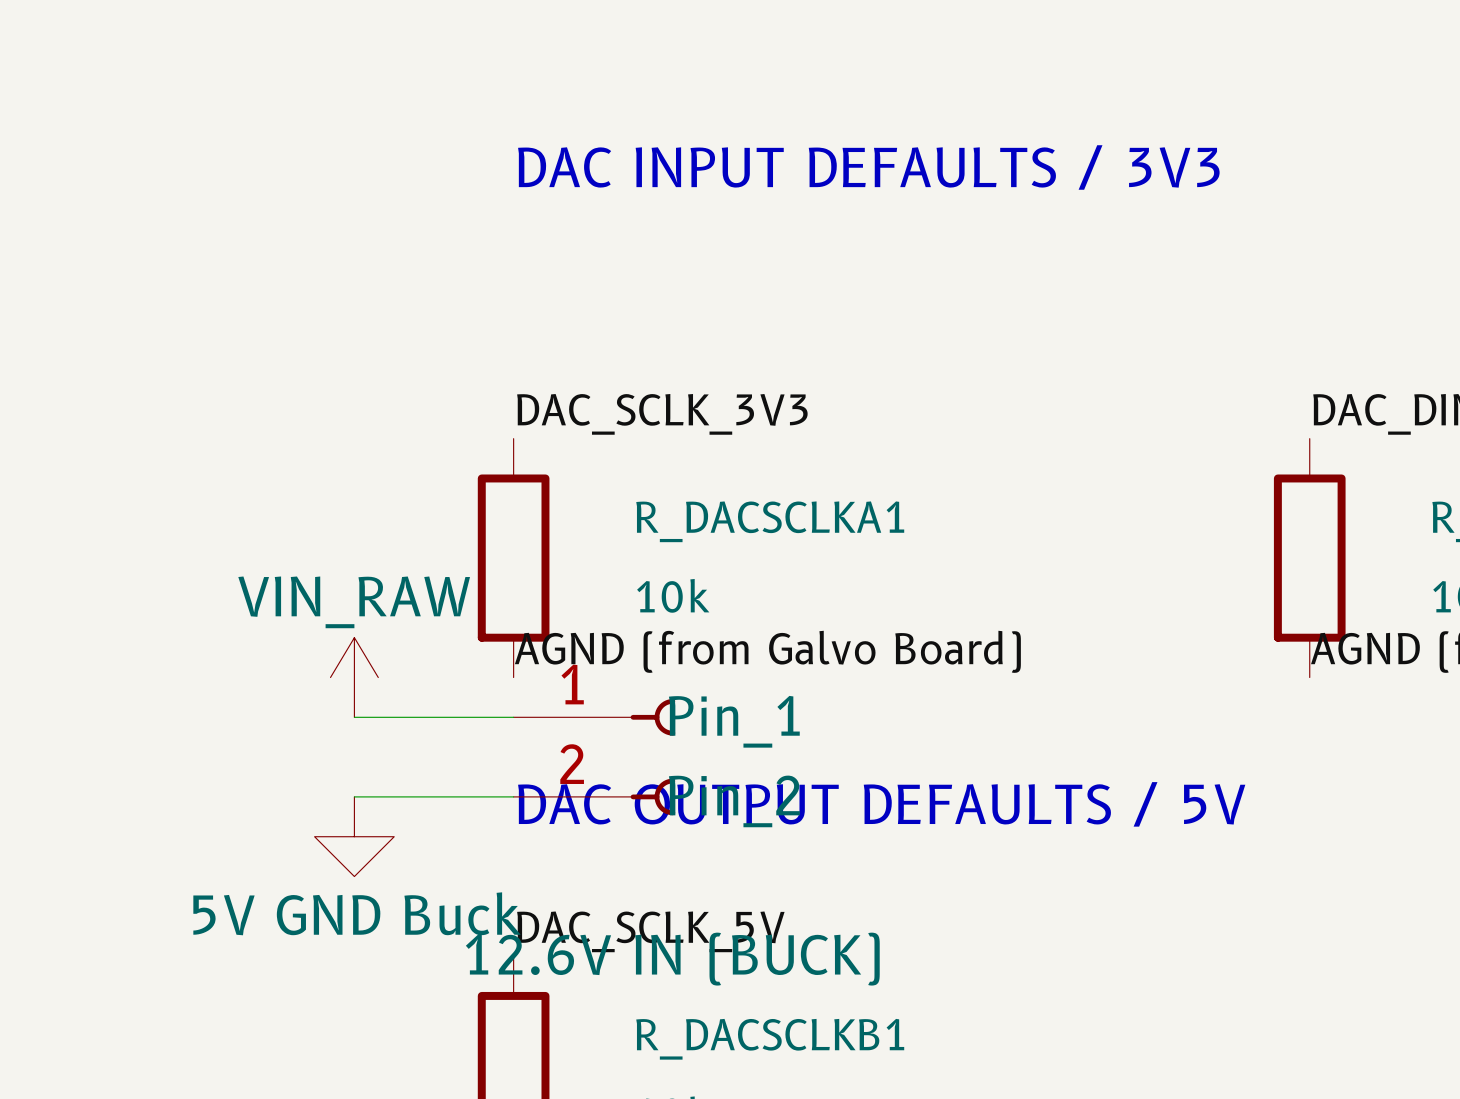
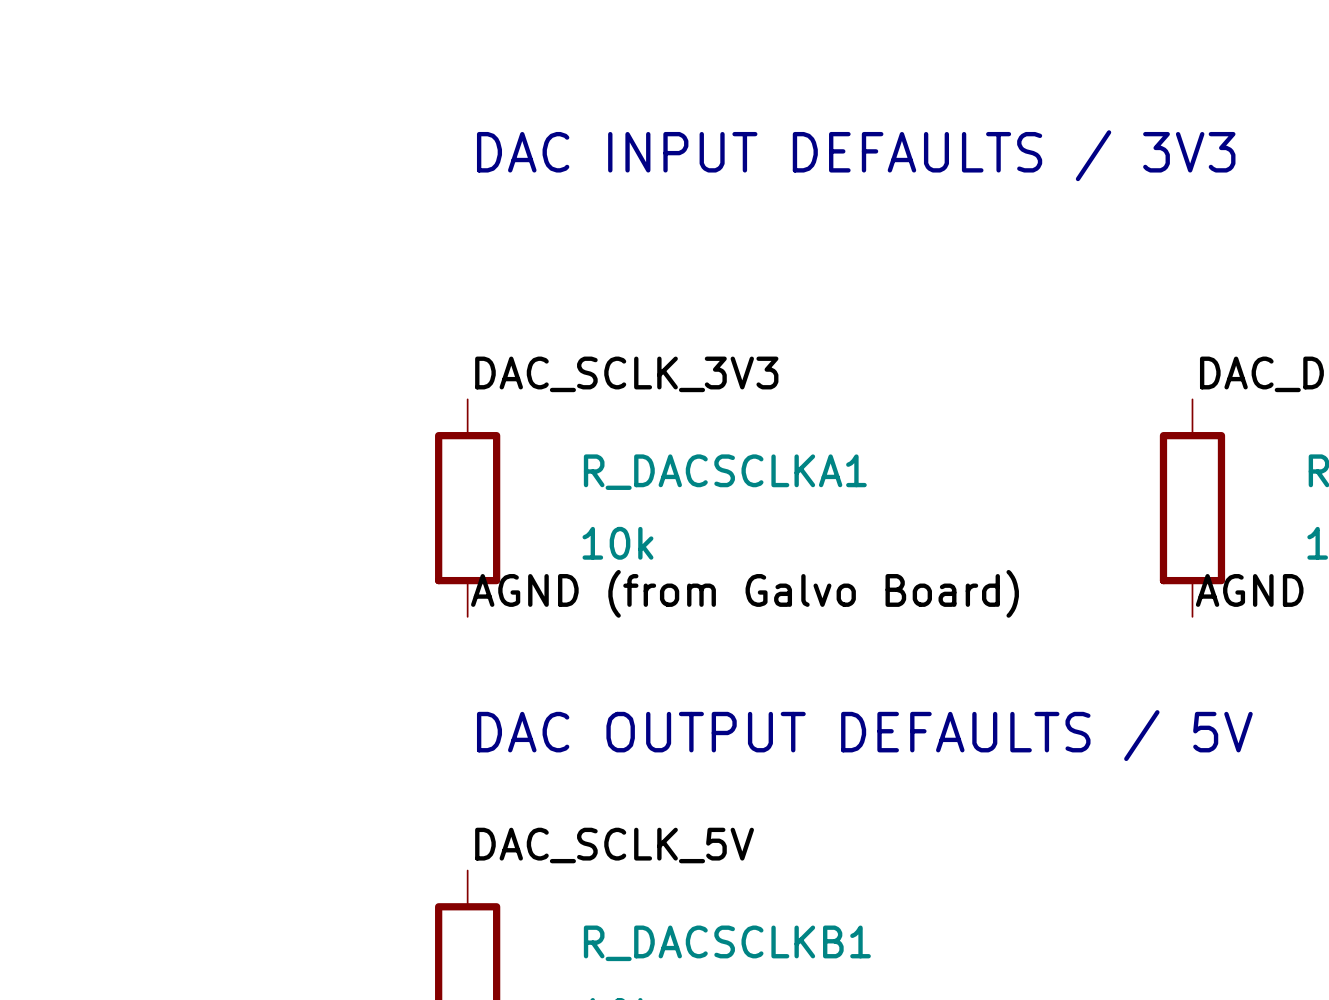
power symbol: VIN_RAW (354, 677) -> none
wire: (354, 717) (513, 717) -> none
part: 12.6V IN (BUCK) (594, 757) -> none
wire: (354, 796) (513, 796) -> none
power symbol: 5V GND Buck (354, 836) -> none

